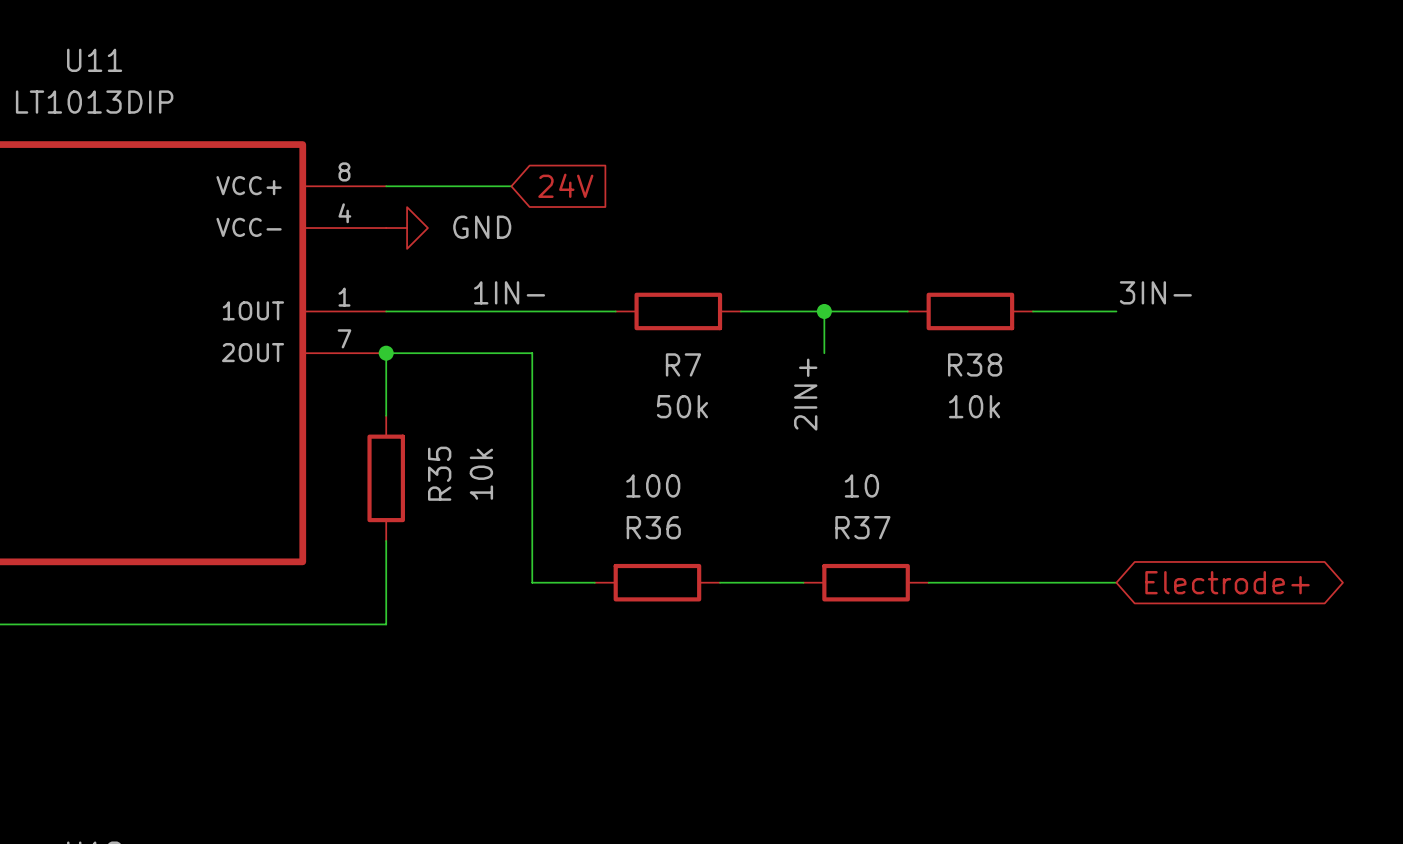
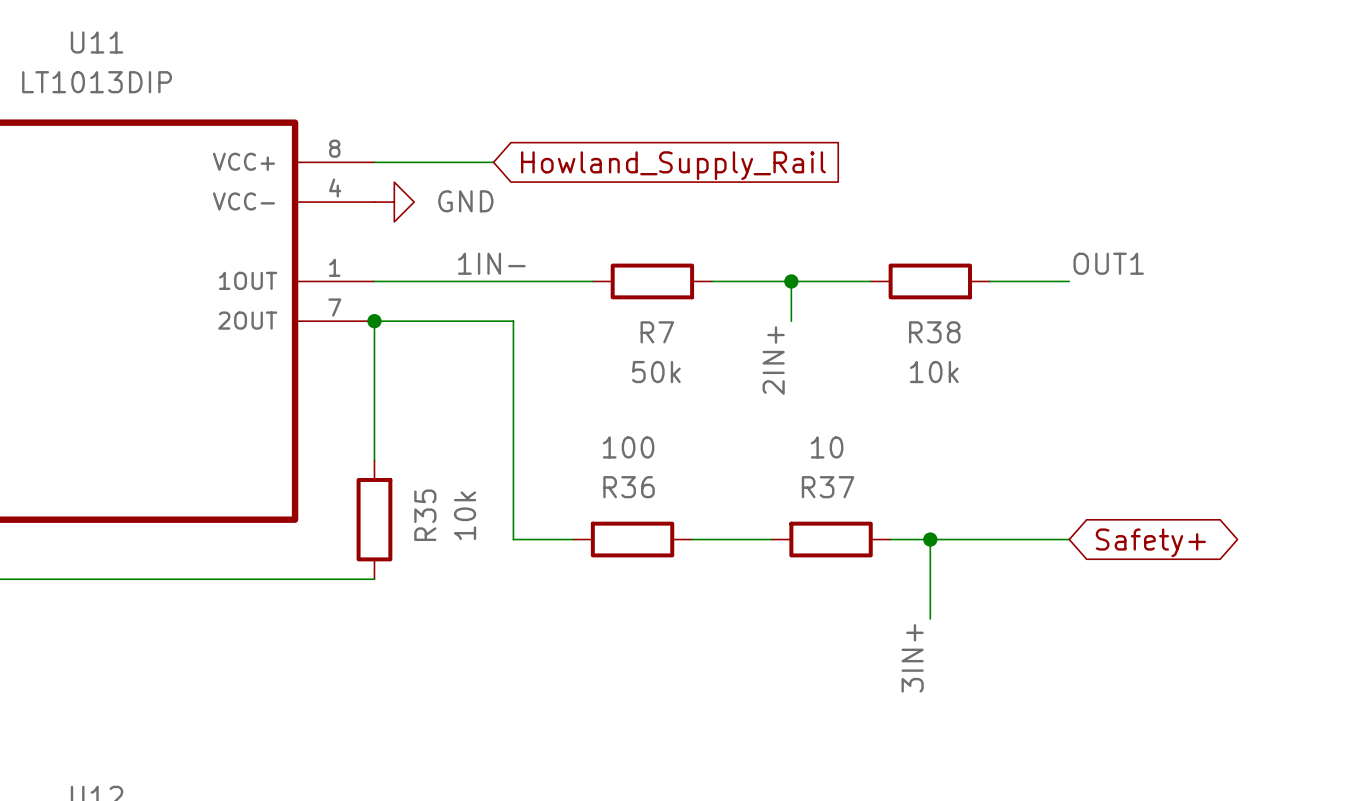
global label: 24V (565, 185) -> Howland_Supply_Rail (673, 165)
label: 3IN- (1155, 292) -> OUT1 (1108, 263)
R35 position: (386, 478) -> (374, 519)
wire: (386, 540) (386, 624) -> (374, 380) (374, 460)
wire: none -> (930, 539) (930, 618)
junction: none -> (930, 539)
global label: Electrode+ (1227, 582) -> Safety+ (1150, 542)
label: none -> 3IN+ (912, 658)

